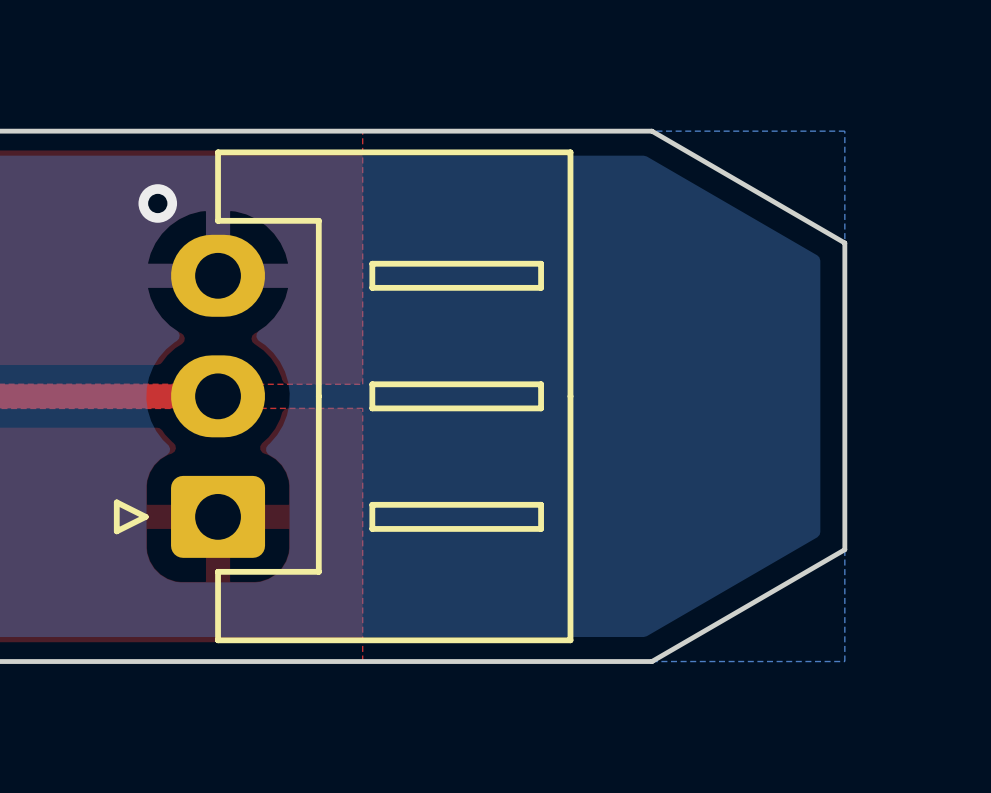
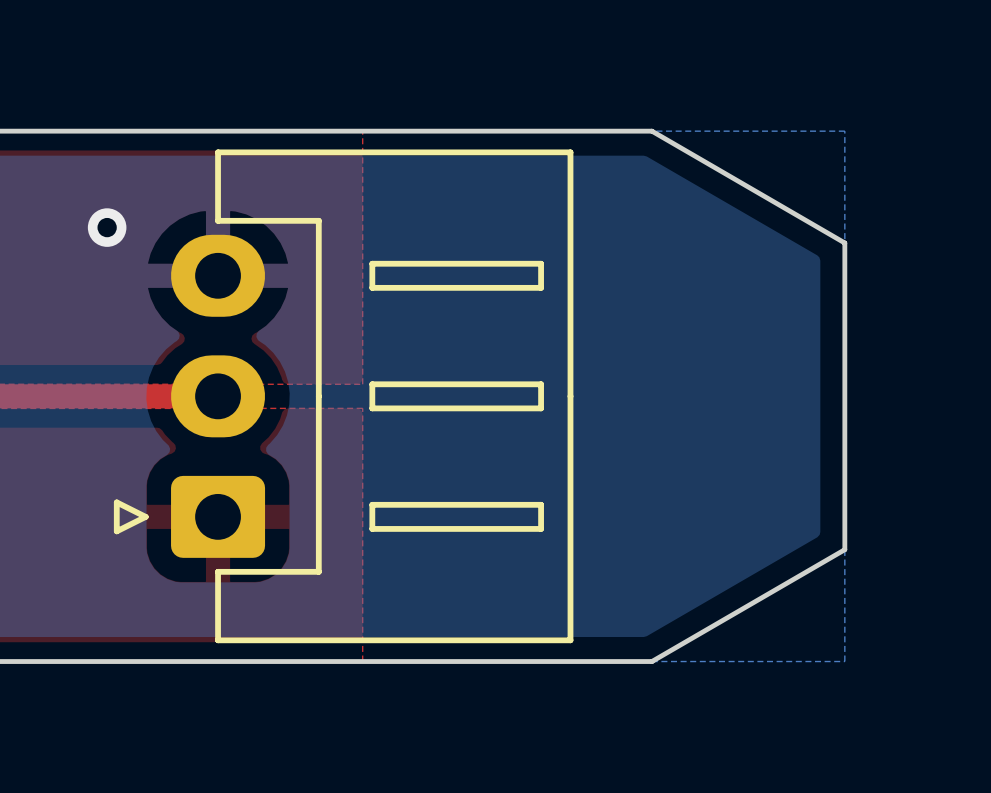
via position: (157, 203) -> (107, 227)

